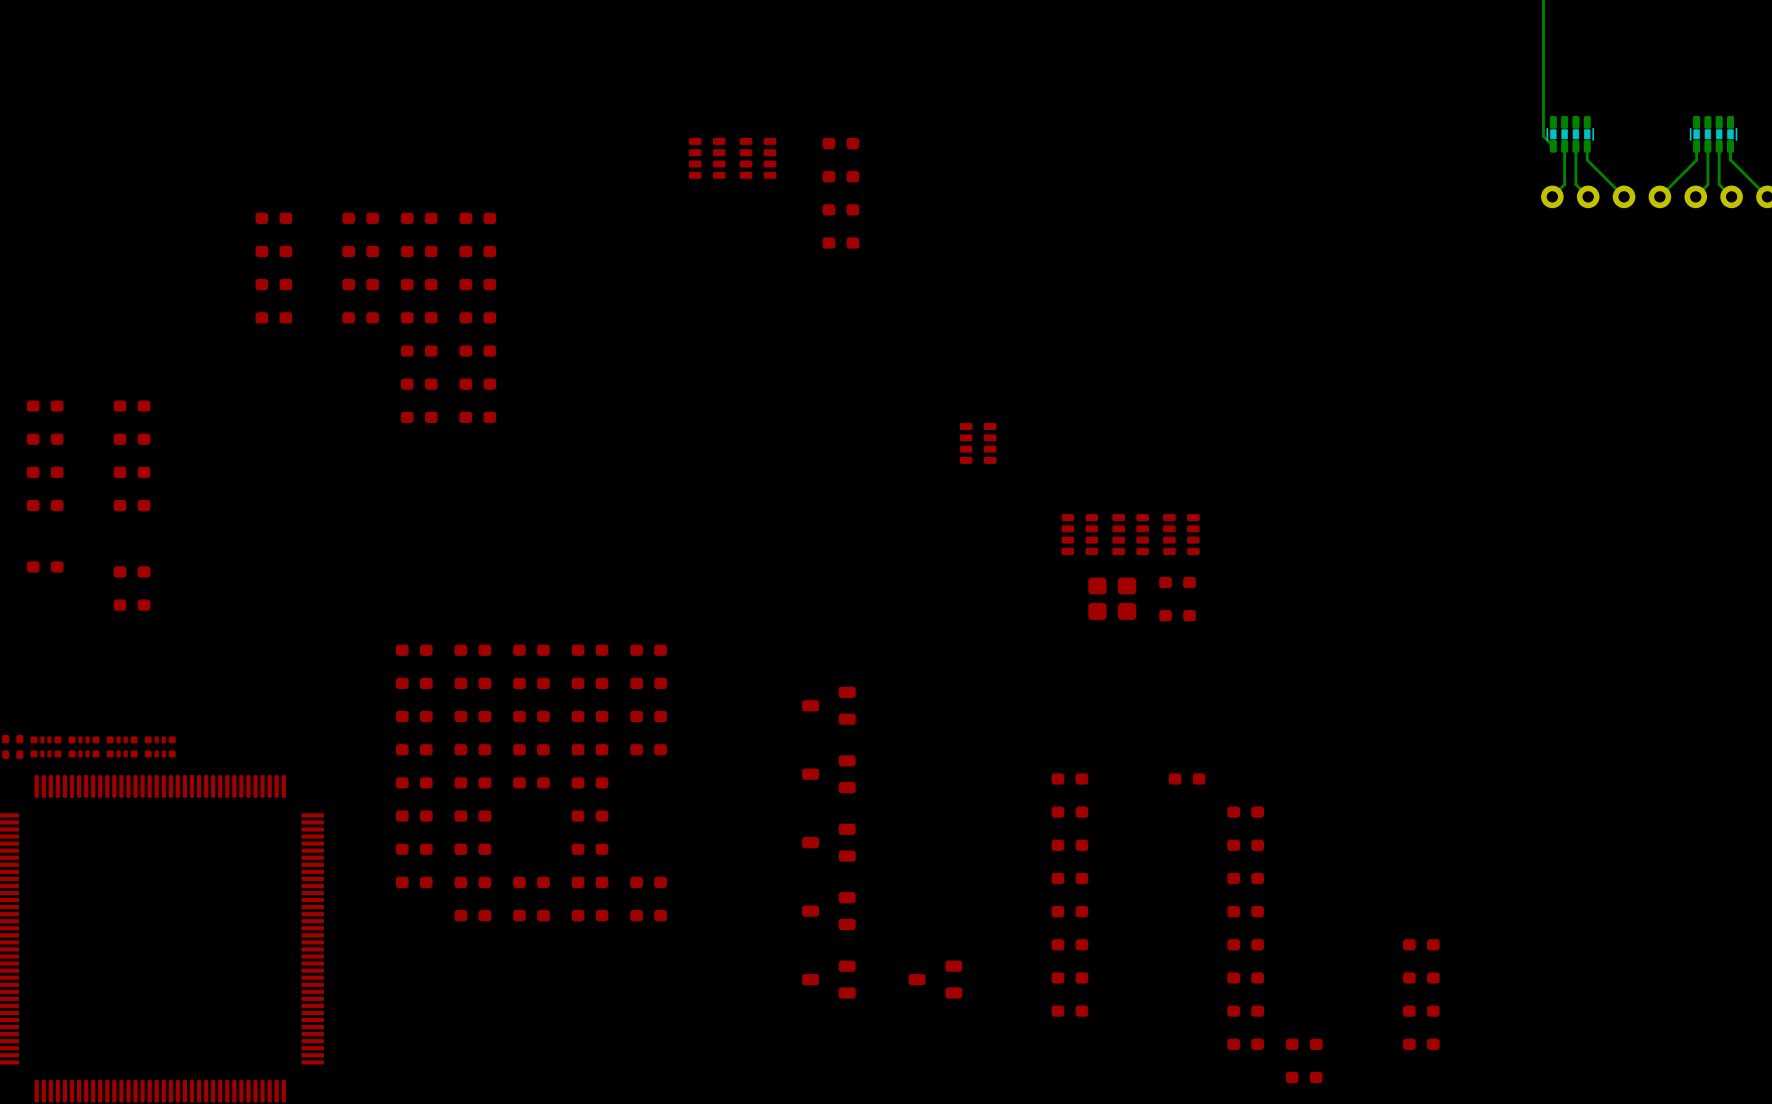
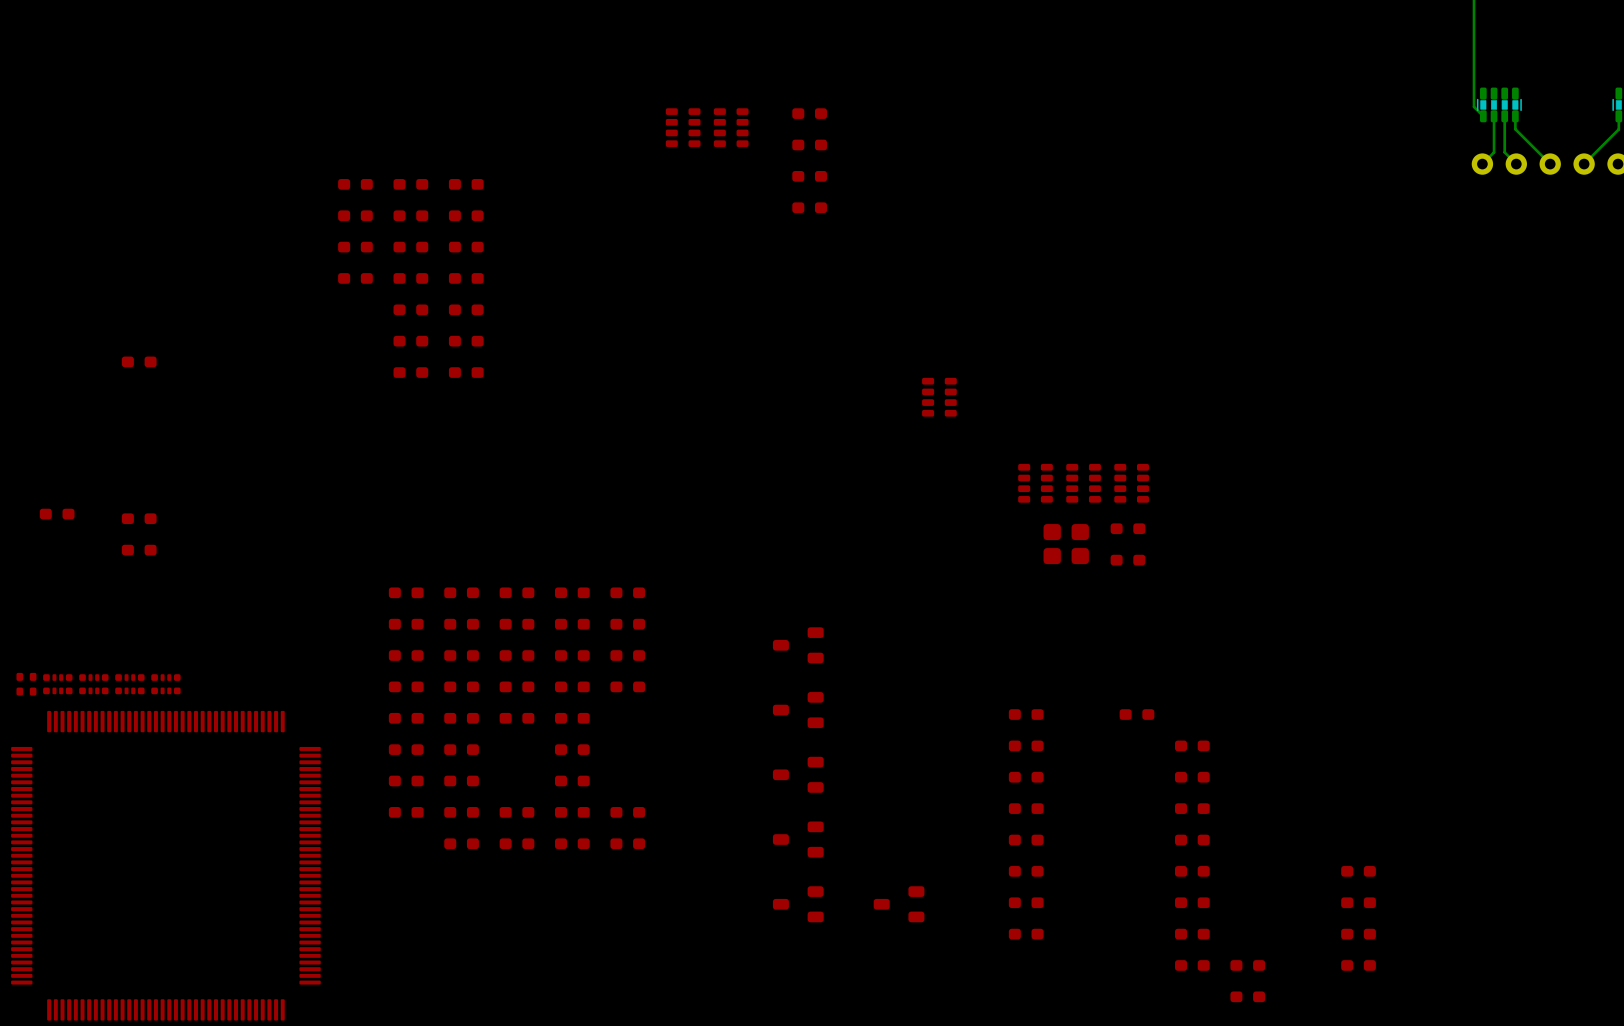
part: (273, 218) -> none
part: (273, 251) -> none
part: (273, 284) -> none
part: (273, 317) -> none
part: (45, 406) -> none
part: (45, 439) -> none
part: (132, 439) -> none
part: (45, 472) -> none
part: (132, 472) -> none
part: (45, 505) -> none
part: (132, 505) -> none

